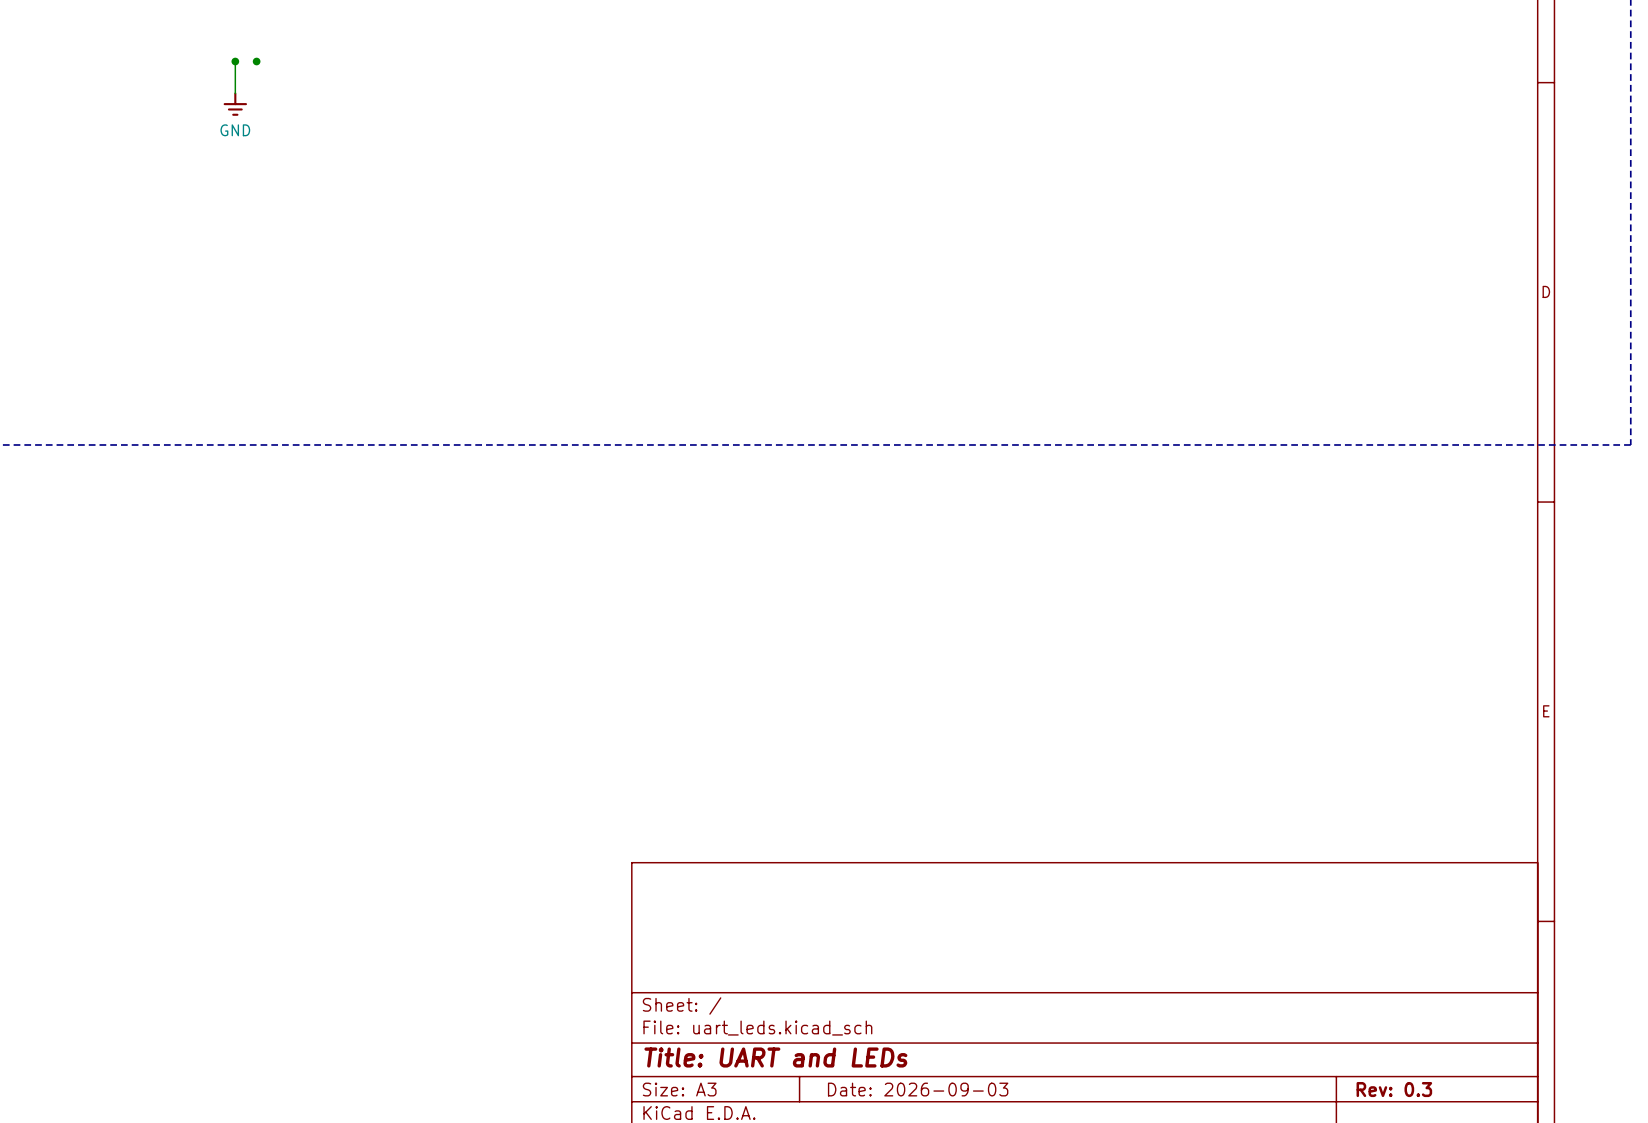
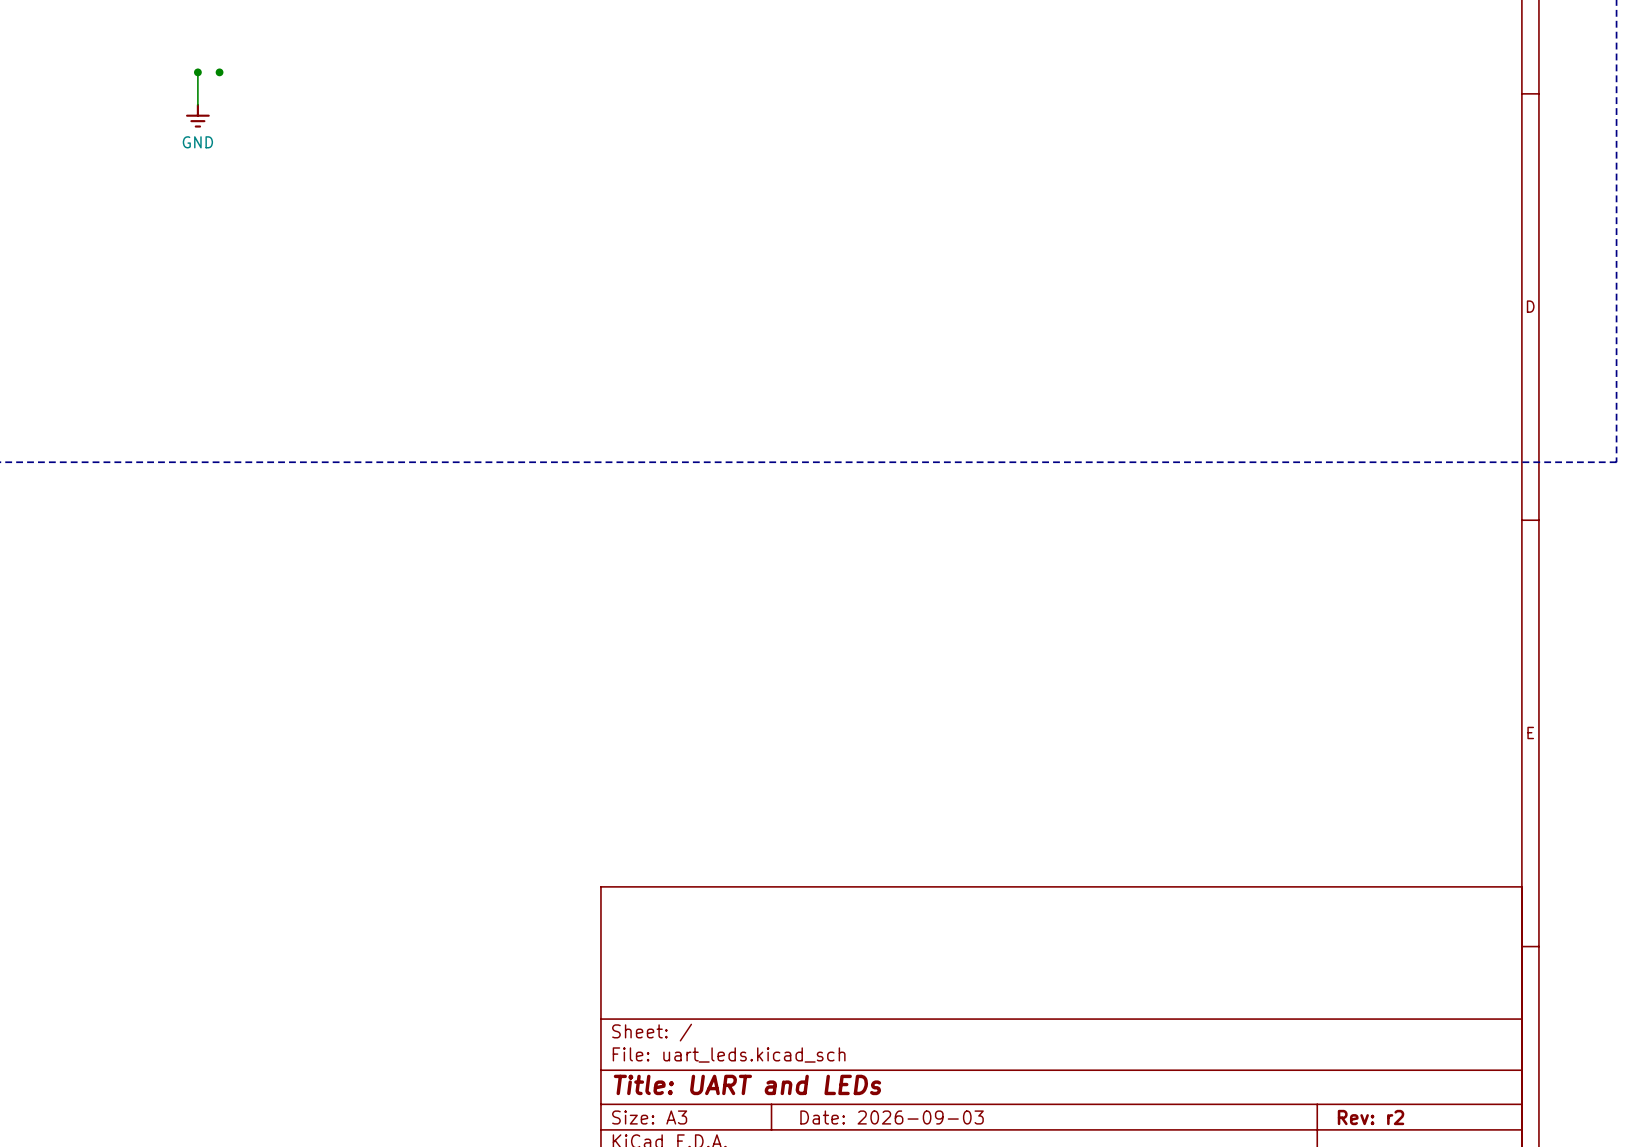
title block: Rev: 0.3 (1394, 1089) -> Rev: r2 (1371, 1117)

